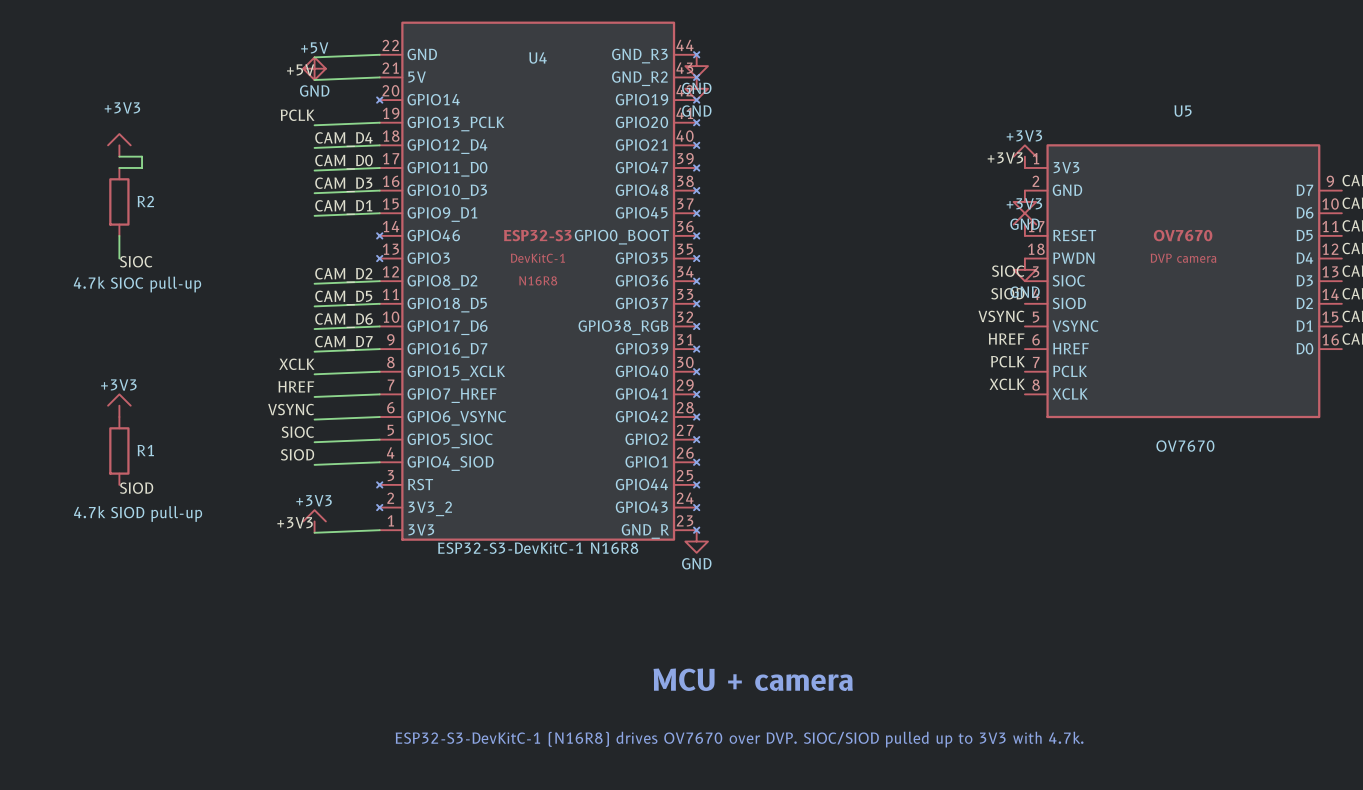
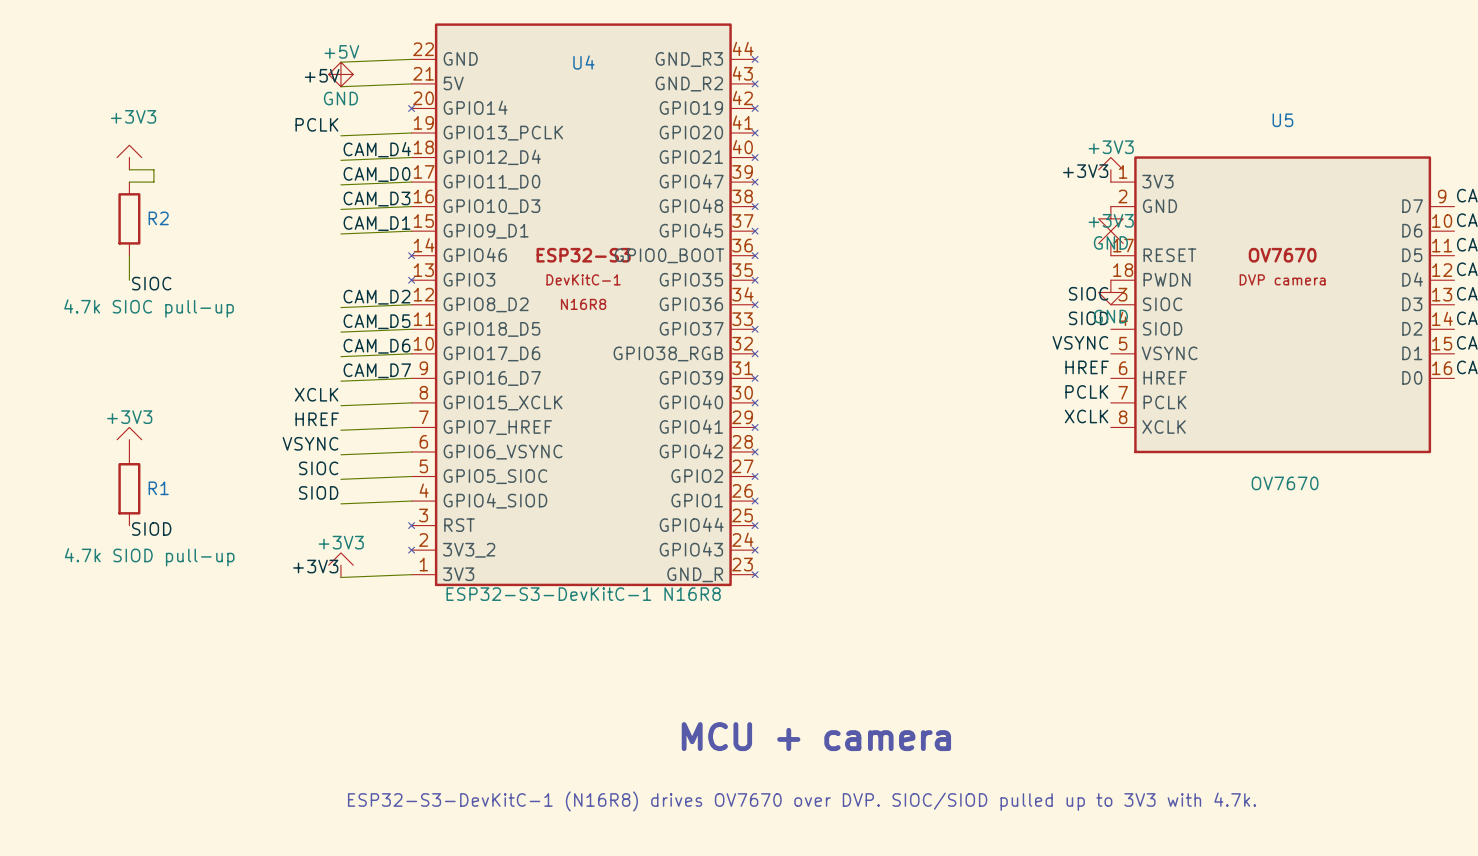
power symbol: GND (696, 66) -> none
power symbol: GND (696, 88) -> none
power symbol: GND (696, 541) -> none

